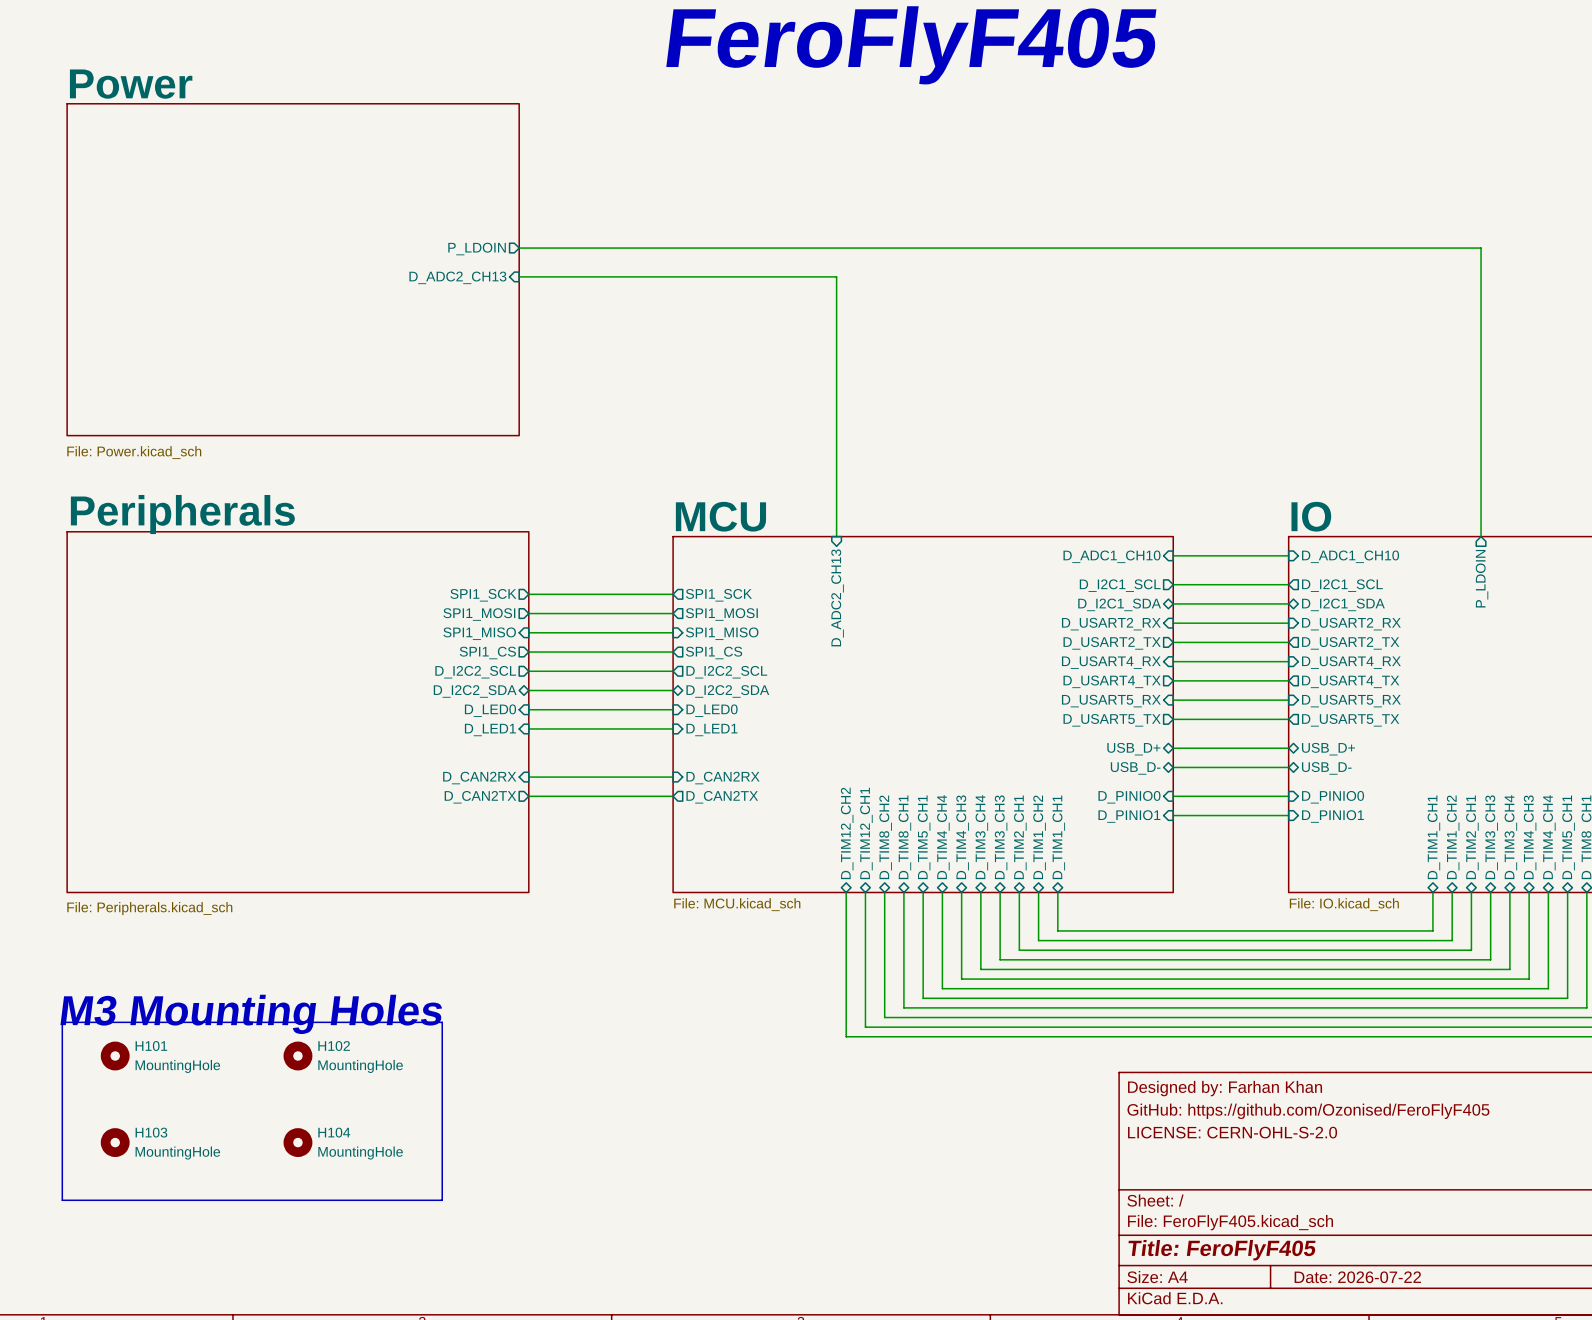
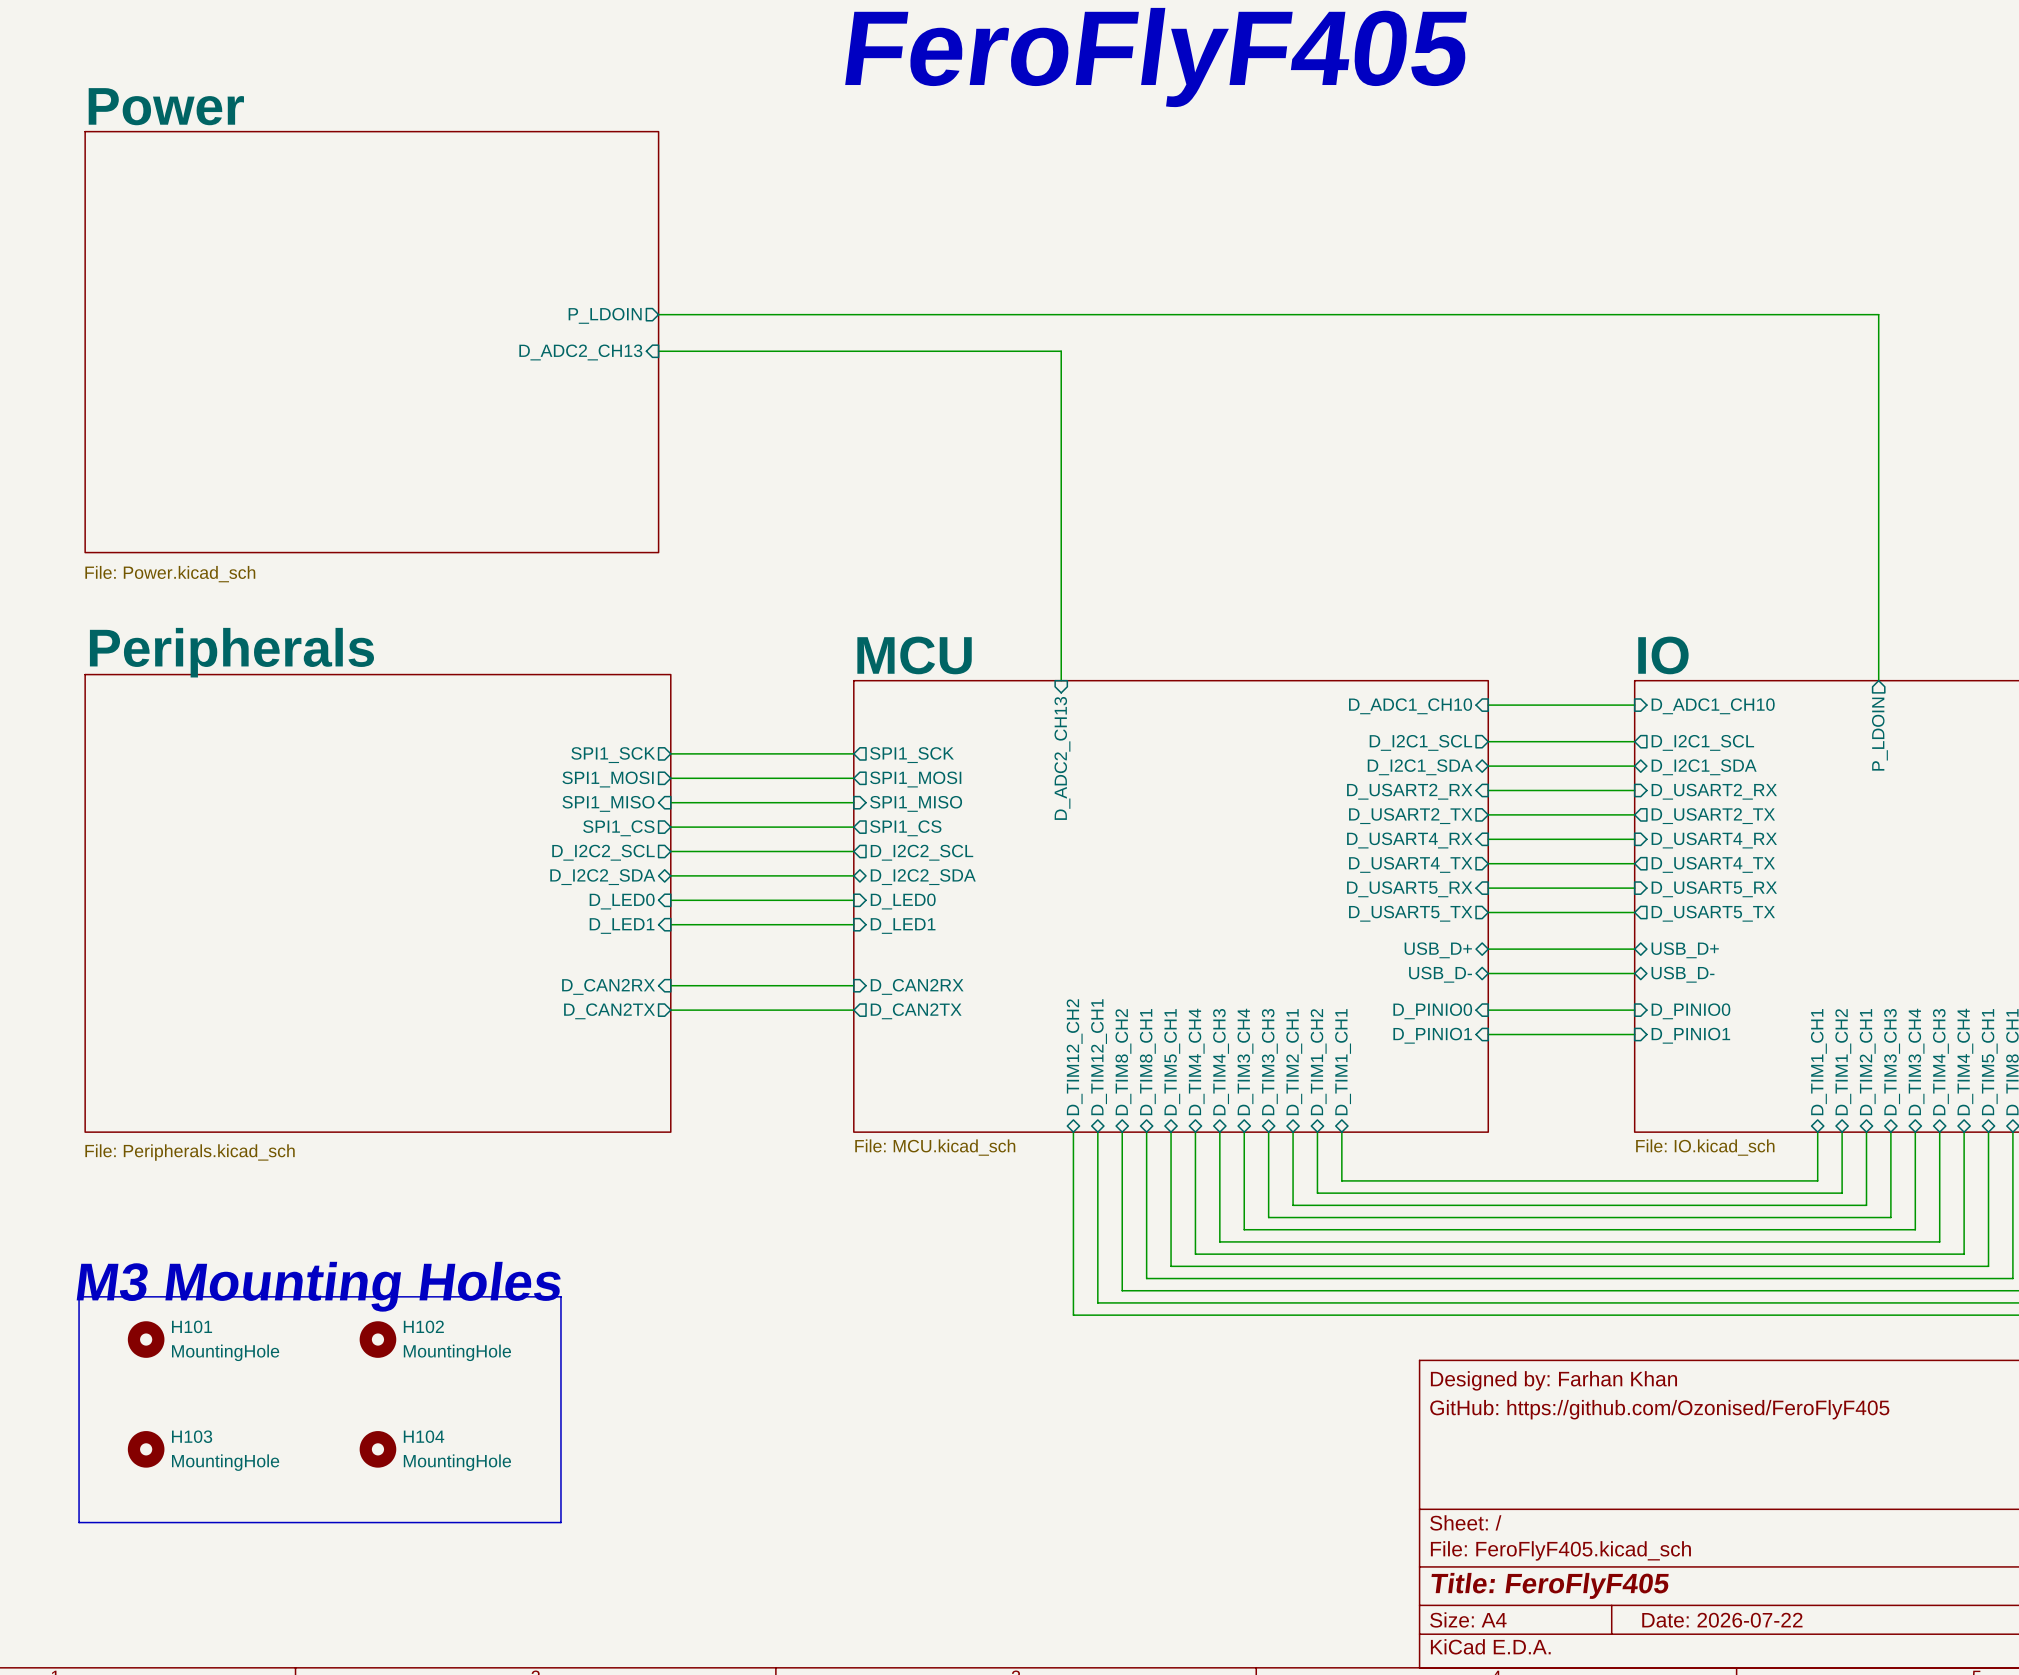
title block: LICENSE: CERN-OHL-S-2.0 (1232, 1132) -> none

